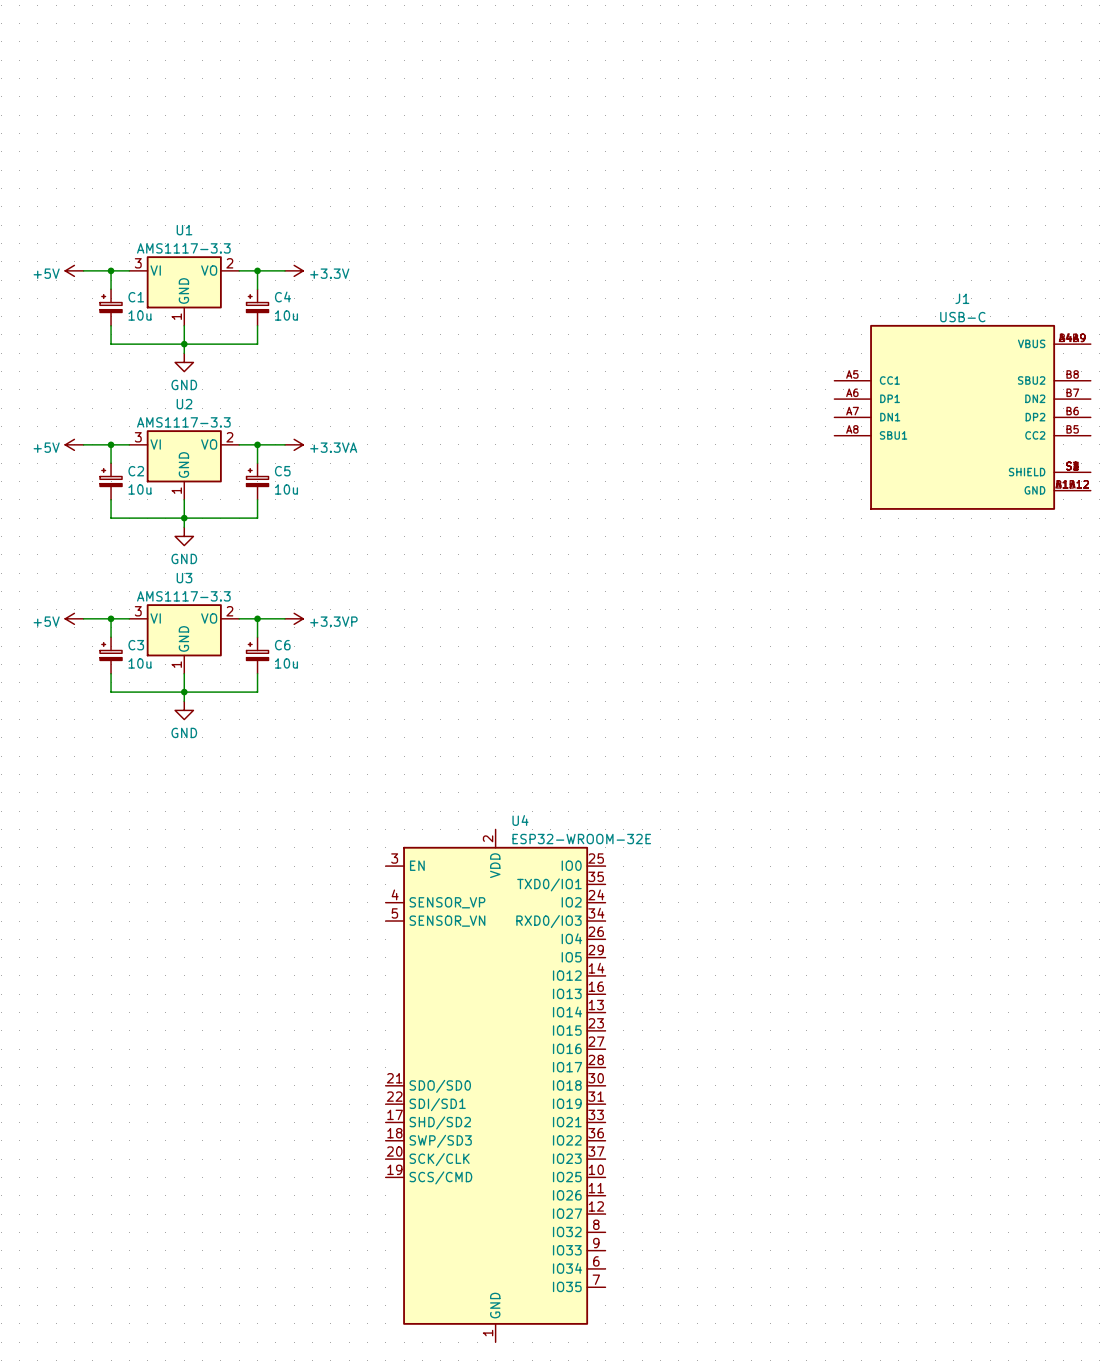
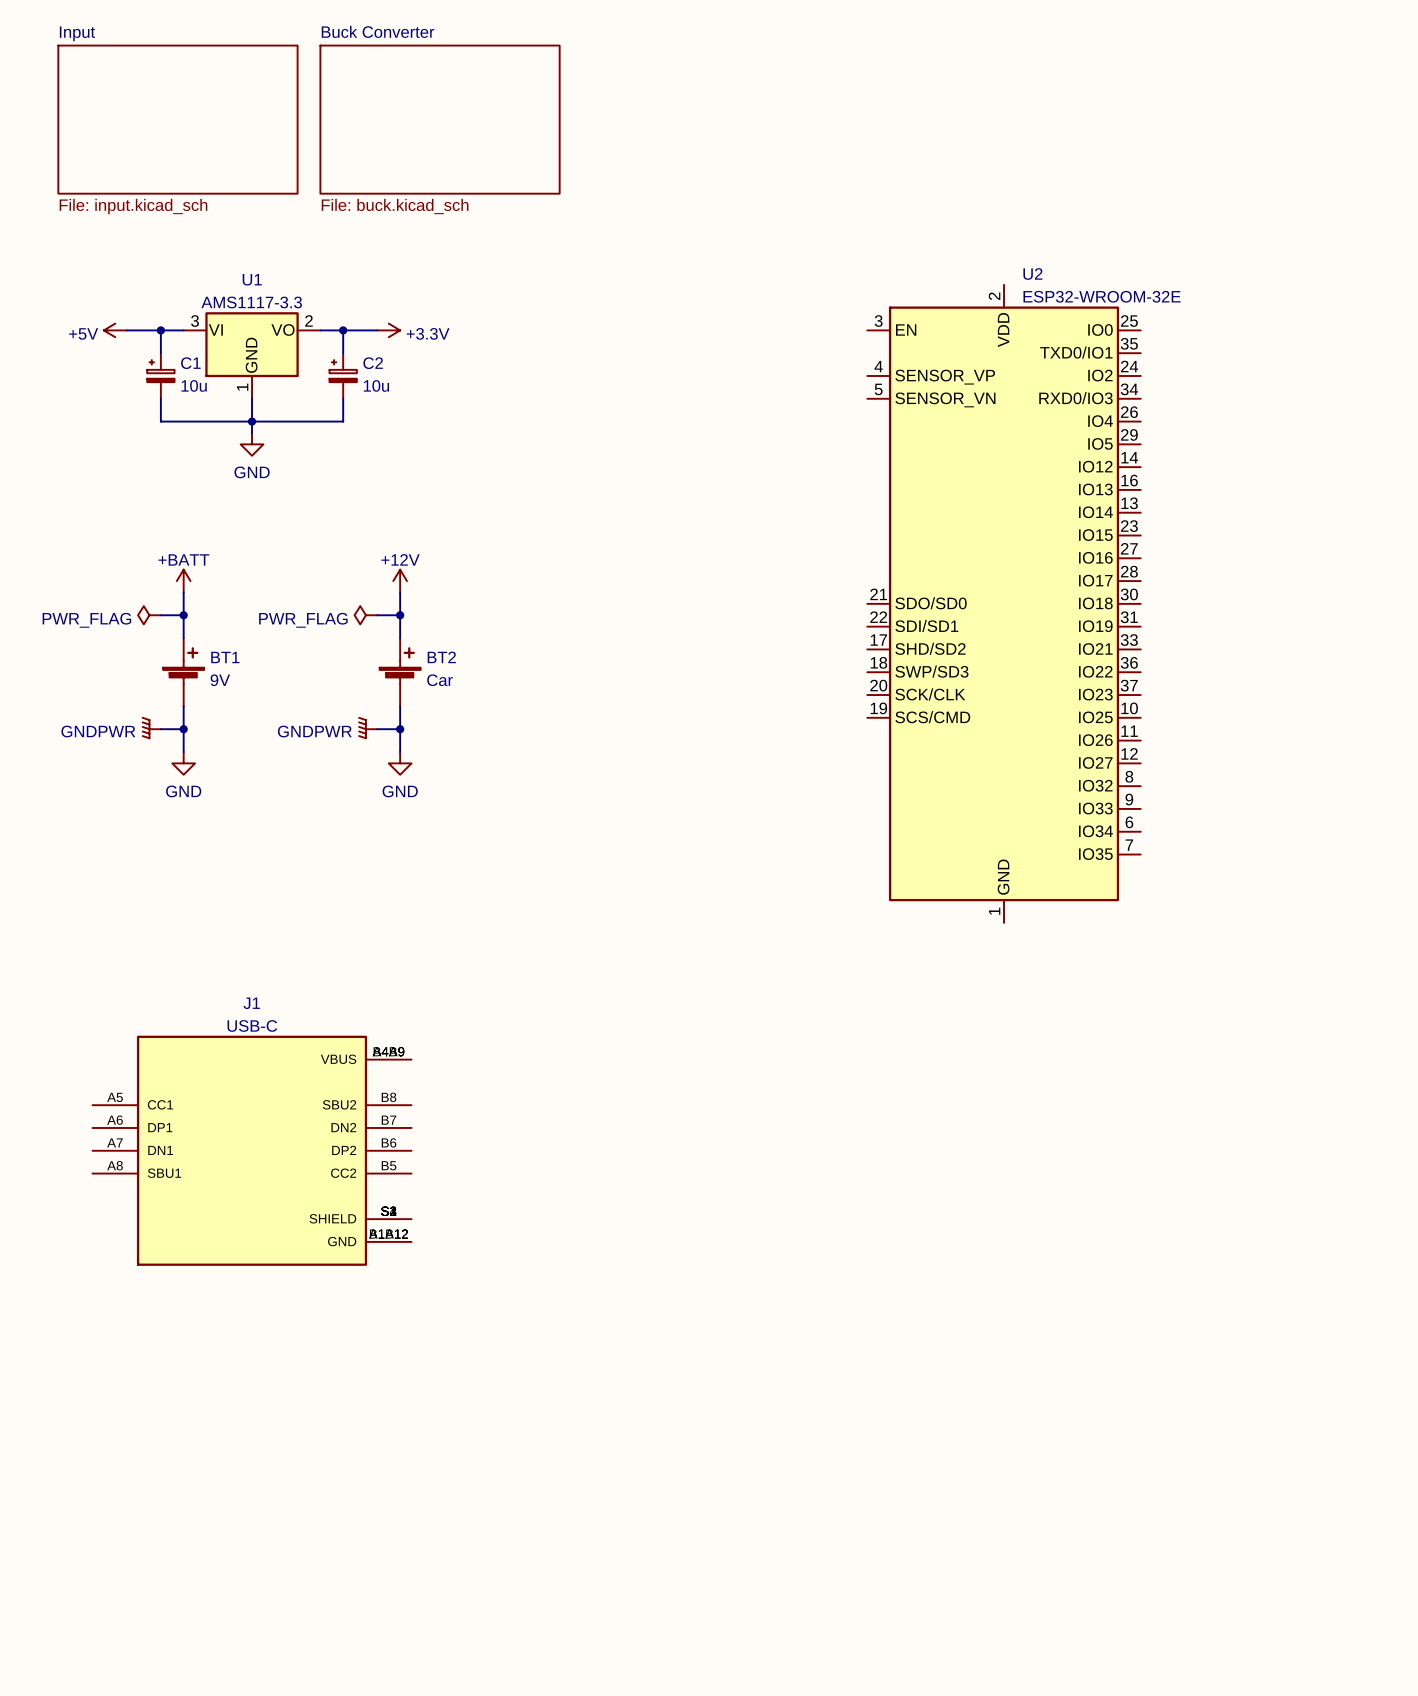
sheet Input: none -> File: input.kicad_sch (177, 119)
sheet Buck Converter: none -> File: buck.kicad_sch (440, 119)
C4 name: C4 (282, 296) -> C2 (373, 363)
U2 name position: U2 (184, 404) -> U2 (1032, 274)
J1 position: (962, 417) -> (252, 1150)
U2 value: AMS1117-3.3 (183, 422) -> ESP32-WROOM-32E (1102, 296)
U2 symbol: [129, 430, 240, 500] -> [867, 284, 1141, 923]
power symbol: +5V (74, 444) -> none
wire: (83, 444) (129, 444) -> none
wire: (111, 444) (111, 463) -> none
junction: (111, 444) -> none
wire: (239, 444) (285, 444) -> none
wire: (257, 444) (257, 463) -> none
junction: (257, 444) -> none
power symbol: +3.3VA (294, 444) -> none
power symbol: none -> +BATT (183, 581)
power symbol: none -> +12V (400, 581)
C2: 10u (111, 481) -> none
wire: none -> (183, 592) (183, 638)
C5: 10u (257, 481) -> none
wire: none -> (400, 592) (400, 638)
power symbol: none -> PWR_FLAG (149, 615)
wire: (111, 499) (111, 518) (257, 518) (257, 499) -> (160, 615) (183, 615)
junction: none -> (183, 615)
wire: (184, 499) (184, 527) -> none
power symbol: none -> PWR_FLAG (365, 615)
wire: none -> (377, 615) (400, 615)
junction: none -> (400, 615)
junction: (184, 518) -> none
power symbol: GND (184, 536) -> none
BT1: none -> 9V (183, 672)
BT2: none -> Car (400, 672)
wire: none -> (183, 706) (183, 751)
wire: none -> (400, 706) (400, 751)
power symbol: none -> GNDPWR (151, 728)
power symbol: none -> GNDPWR (367, 728)
wire: none -> (160, 729) (183, 729)
wire: none -> (377, 729) (400, 729)
junction: none -> (400, 729)
power symbol: +5V (74, 618) -> none
wire: (83, 618) (129, 618) -> none
wire: (111, 618) (111, 637) -> none
junction position: (111, 618) -> (183, 729)
power symbol: none -> GND (183, 763)
wire: (239, 618) (285, 618) -> none
wire: (257, 618) (257, 637) -> none
junction: (257, 618) -> none
power symbol: +3.3VP (294, 618) -> none
power symbol: none -> GND (400, 763)
U3: AMS1117-3.3 (184, 638) -> none
C3: 10u (111, 655) -> none
C6: 10u (257, 655) -> none
wire: (111, 673) (111, 692) (257, 692) (257, 673) -> none
wire: (184, 673) (184, 701) -> none
junction: (184, 692) -> none
power symbol: GND (184, 710) -> none
U4: ESP32-WROOM-32E (495, 1085) -> none

